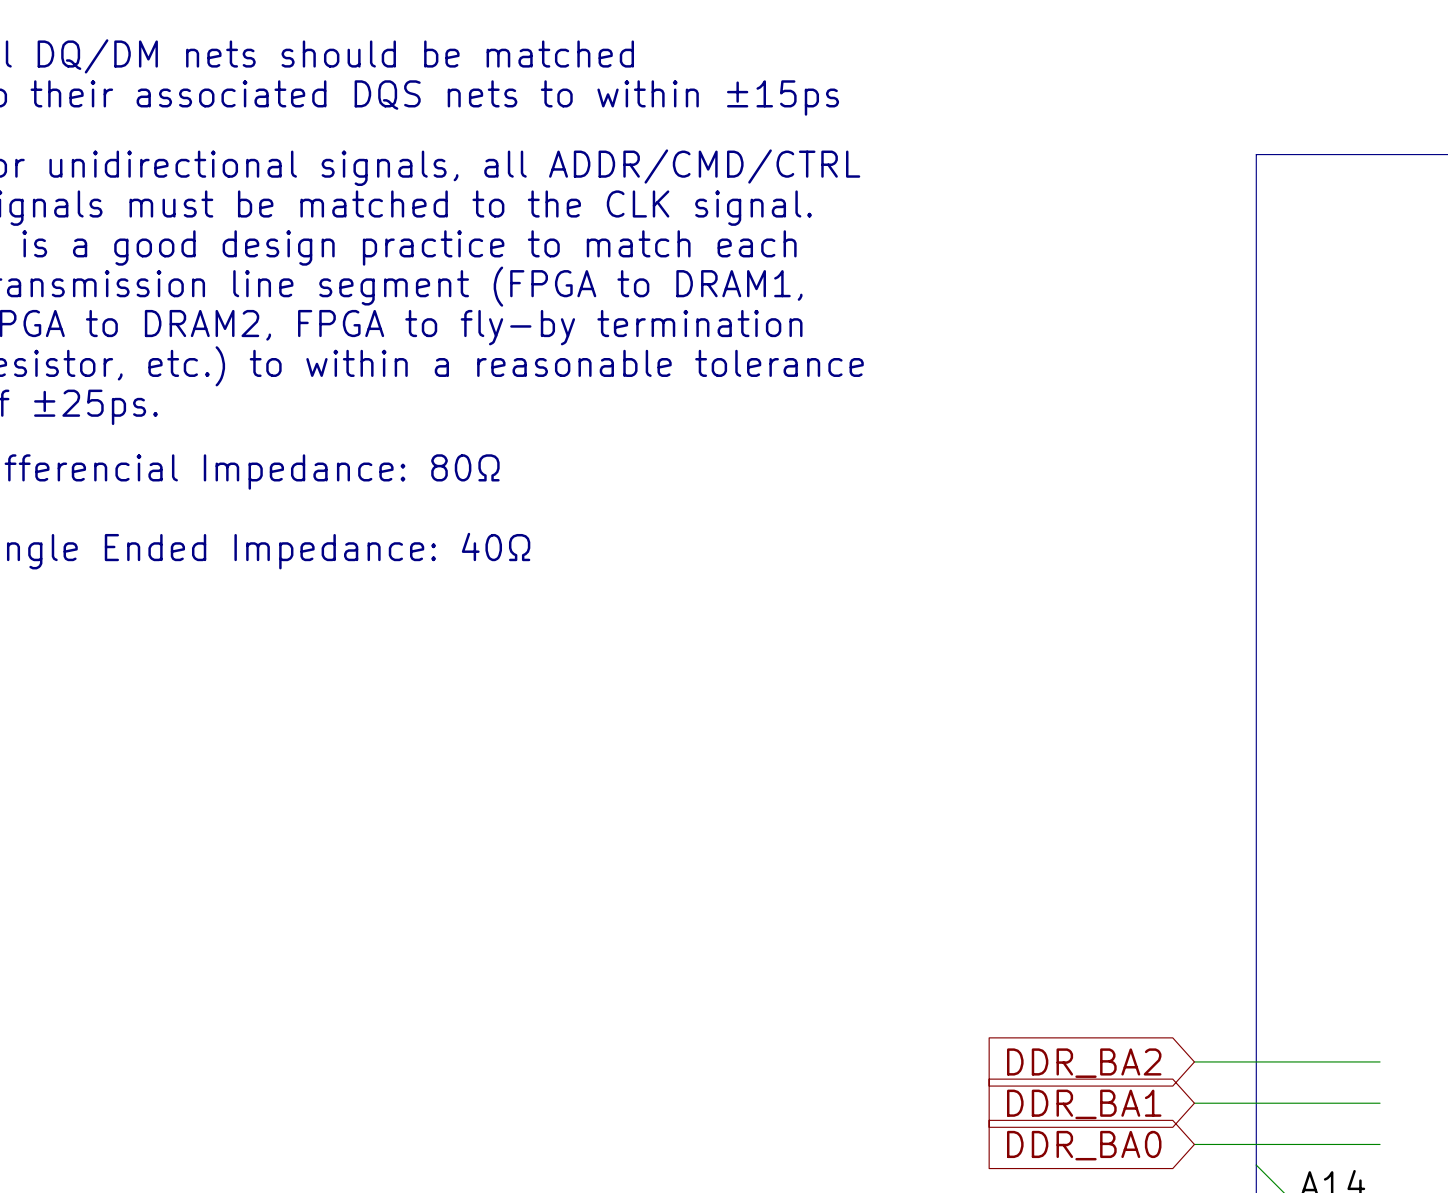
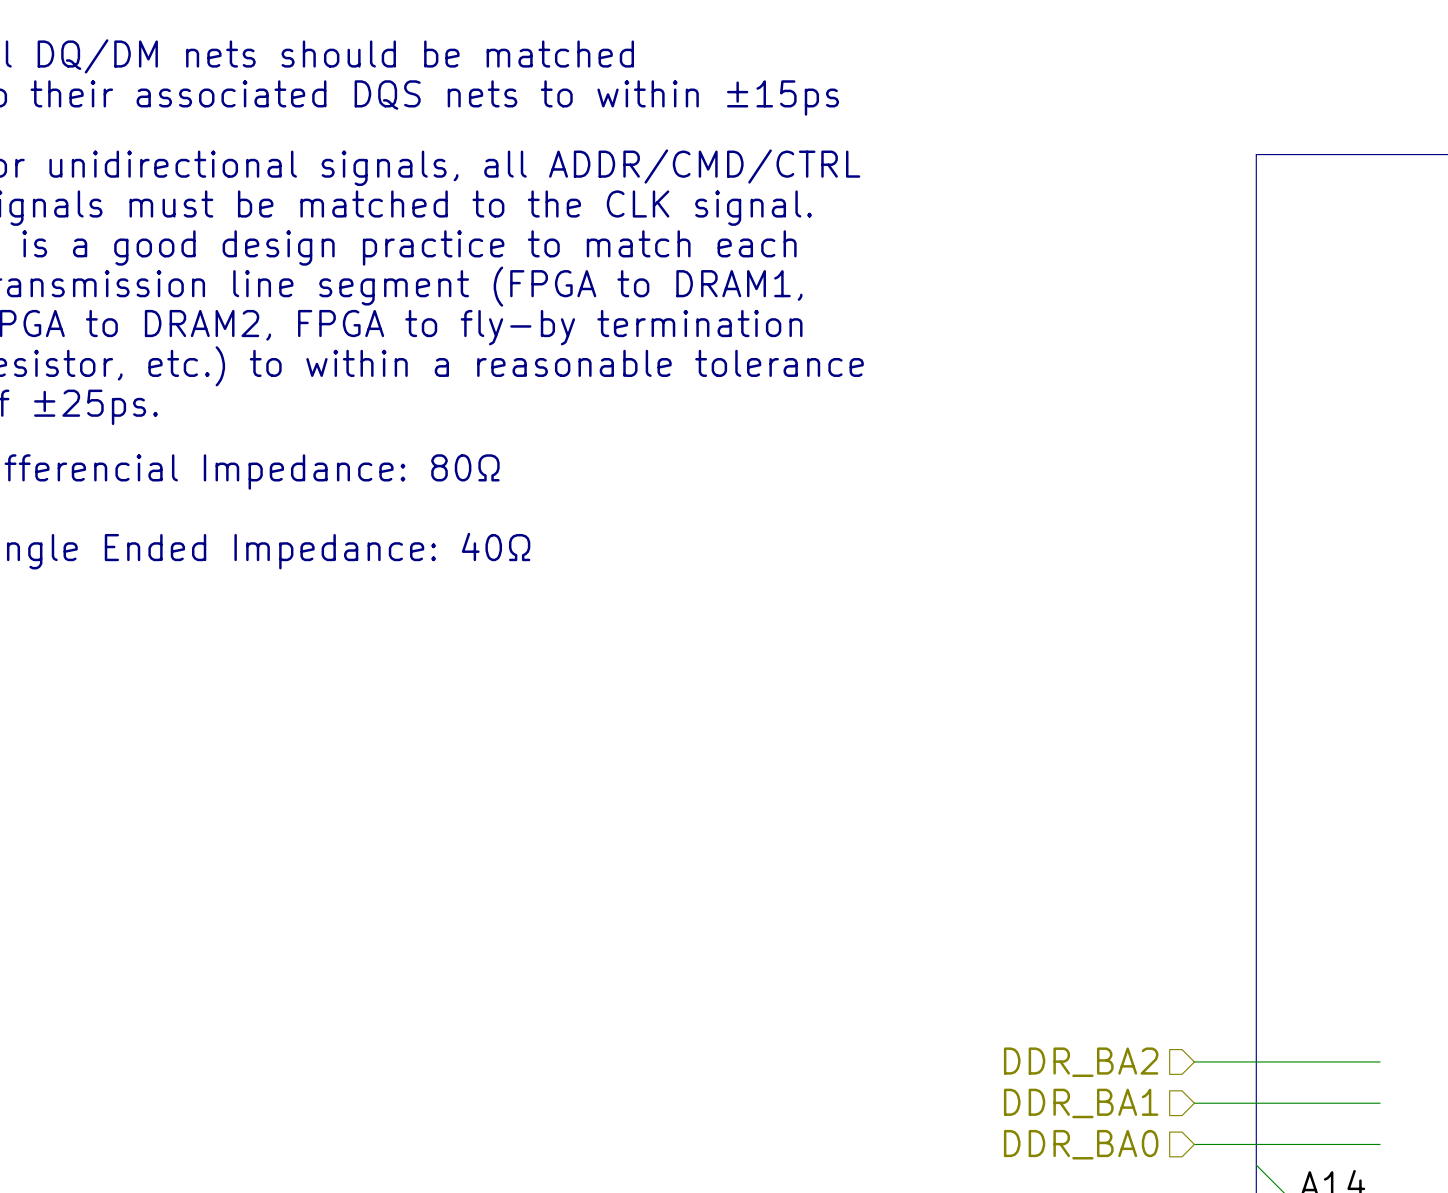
hierarchical label: none -> DDR_BA2 (1081, 1062)
global label: DDR_BA2 (1084, 1063) -> none
hierarchical label: none -> DDR_BA1 (1081, 1103)
global label: DDR_BA1 (1084, 1104) -> none
hierarchical label: none -> DDR_BA0 (1081, 1144)
global label: DDR_BA0 (1084, 1145) -> none

